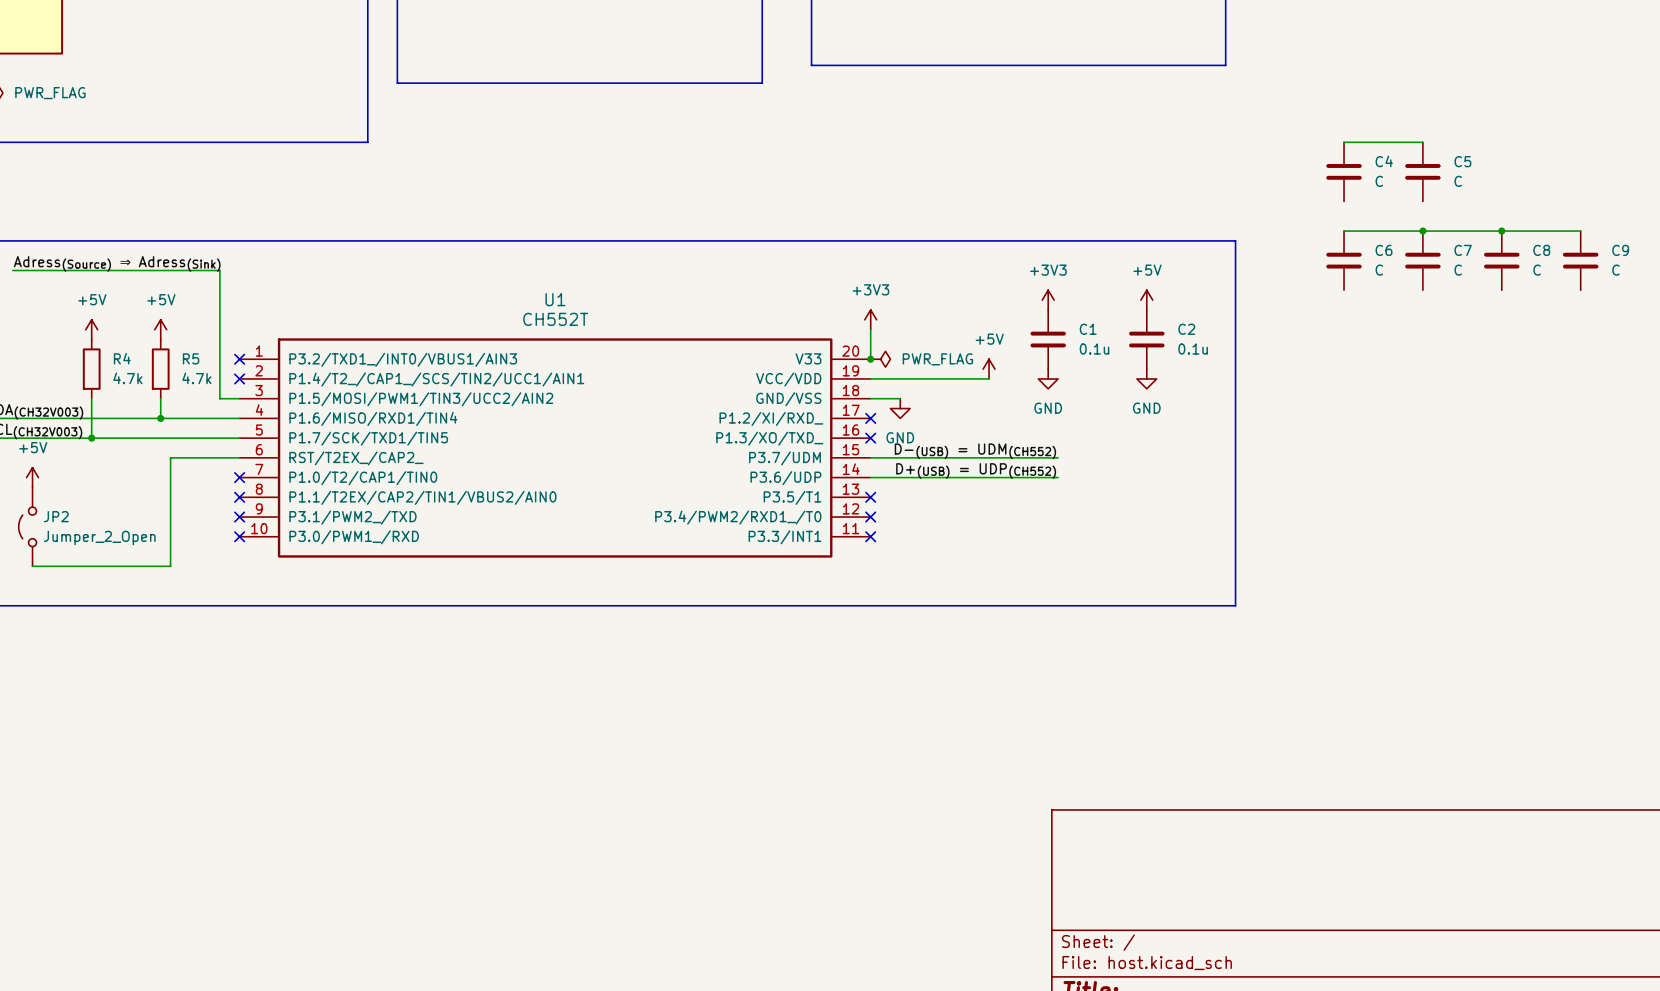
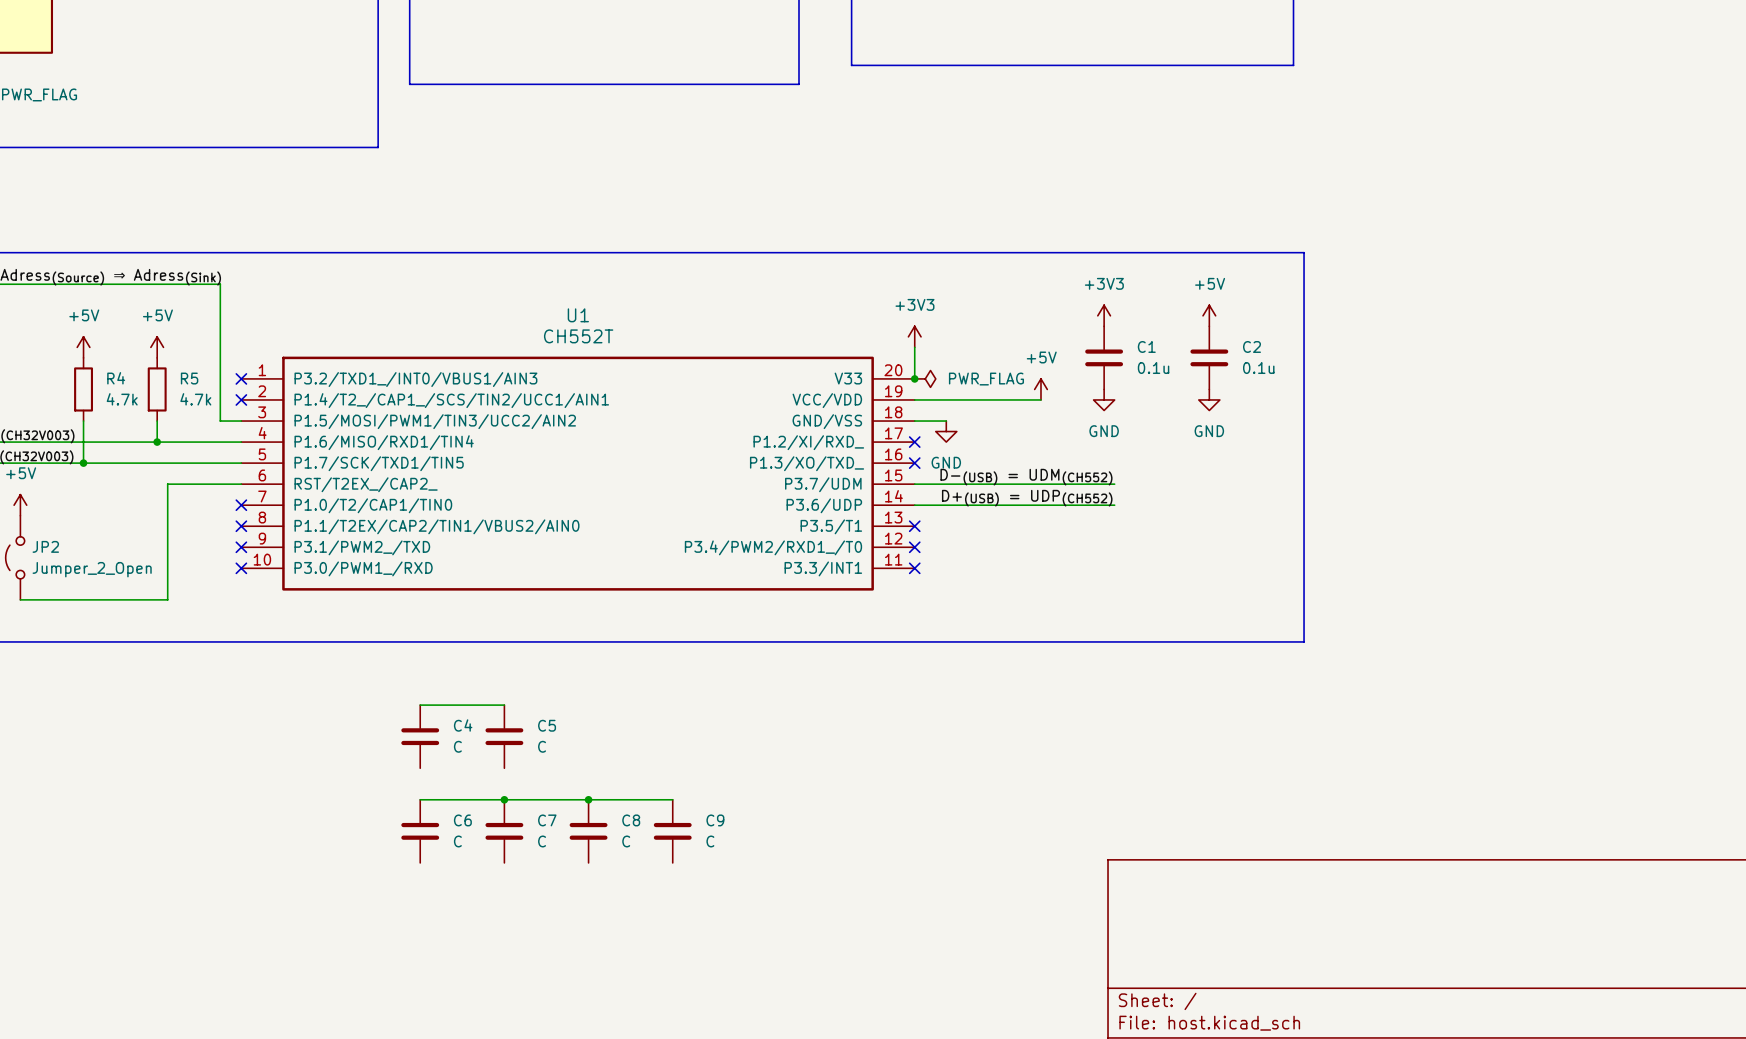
wire: (1344, 142) (1422, 142) -> none
C4 position: (1344, 171) -> (420, 736)
C5 position: (1422, 171) -> (504, 736)
wire: (1344, 231) (1580, 231) -> none
junction: (1422, 231) -> none
junction: (1501, 231) -> none
C6 position: (1344, 260) -> (420, 831)
C7 position: (1422, 260) -> (504, 831)
C8 position: (1501, 260) -> (588, 831)
C9 position: (1580, 260) -> (672, 831)
wire: none -> (420, 705) (504, 705)
wire: none -> (420, 799) (672, 799)
junction: none -> (504, 799)
junction: none -> (588, 799)

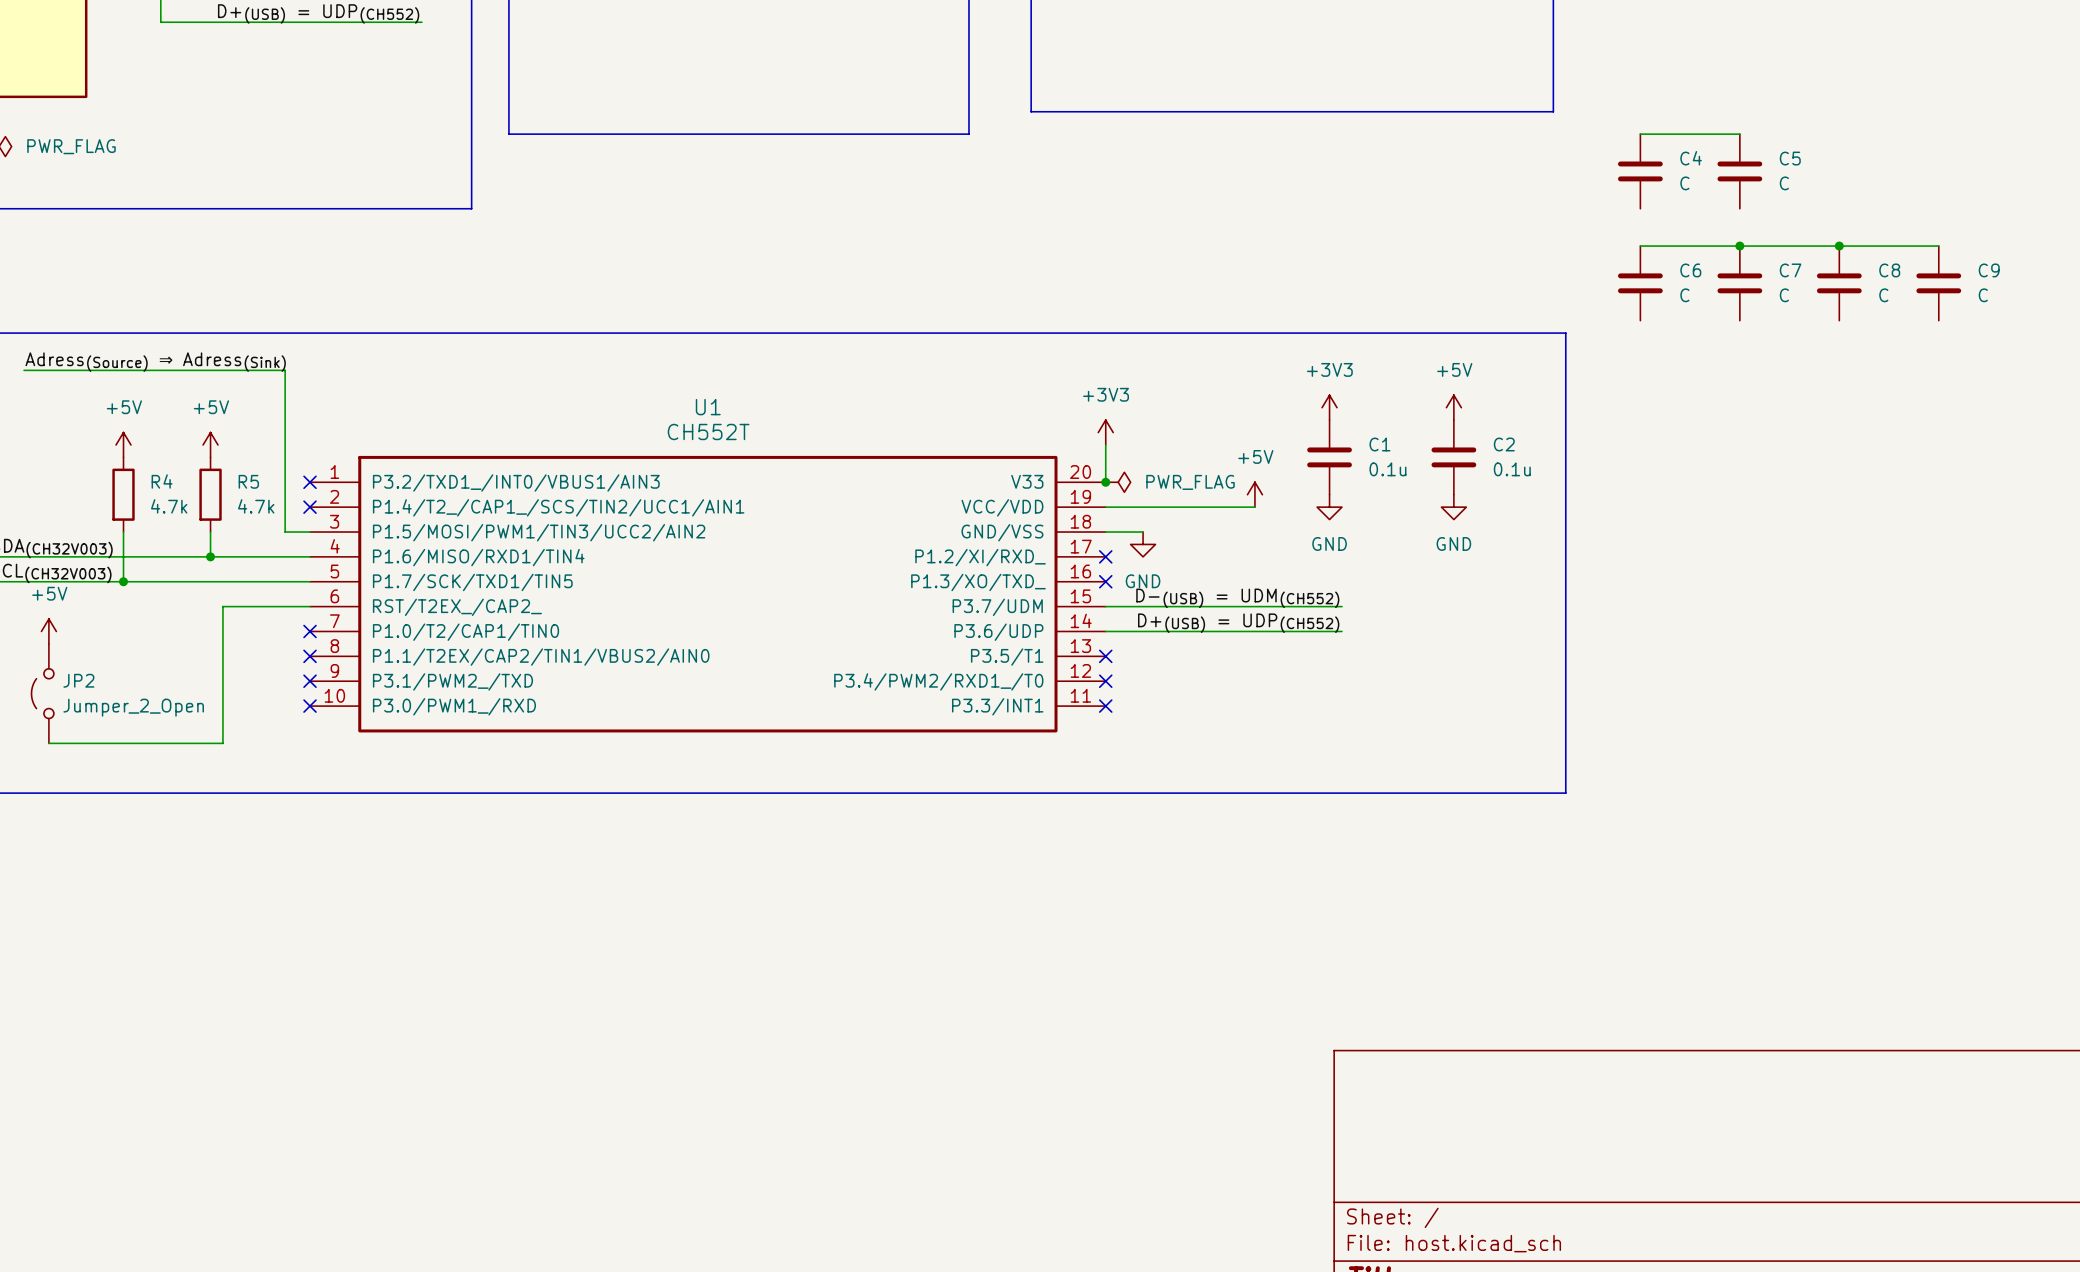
wire: none -> (1640, 134) (1739, 134)
wire: none -> (1640, 246) (1938, 246)
junction: none -> (1739, 246)
junction: none -> (1839, 246)
wire: (420, 705) (504, 705) -> none
C4 position: (420, 736) -> (1640, 171)
C5 position: (504, 736) -> (1739, 171)
wire: (420, 799) (672, 799) -> none
junction: (504, 799) -> none
junction: (588, 799) -> none
C6 position: (420, 831) -> (1640, 283)
C7 position: (504, 831) -> (1739, 283)
C8 position: (588, 831) -> (1839, 283)
C9 position: (672, 831) -> (1938, 283)

